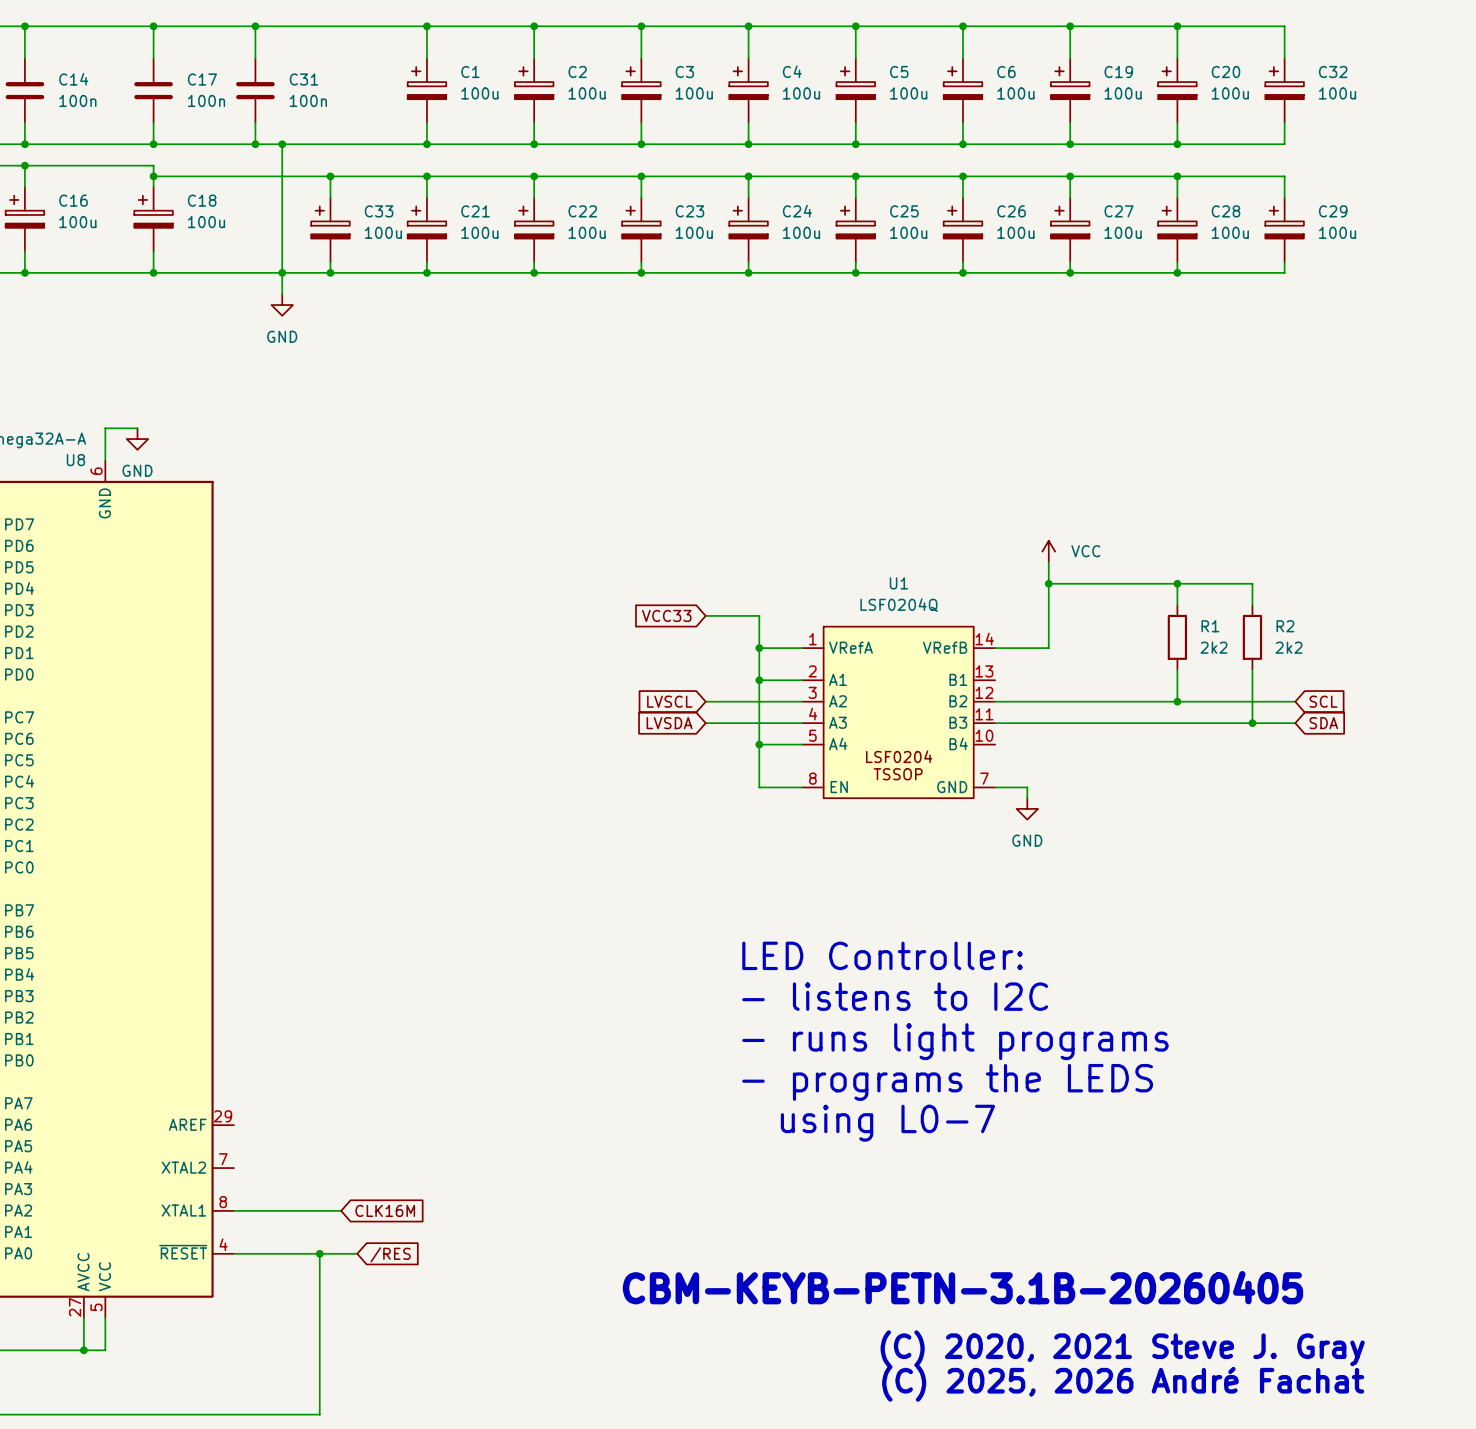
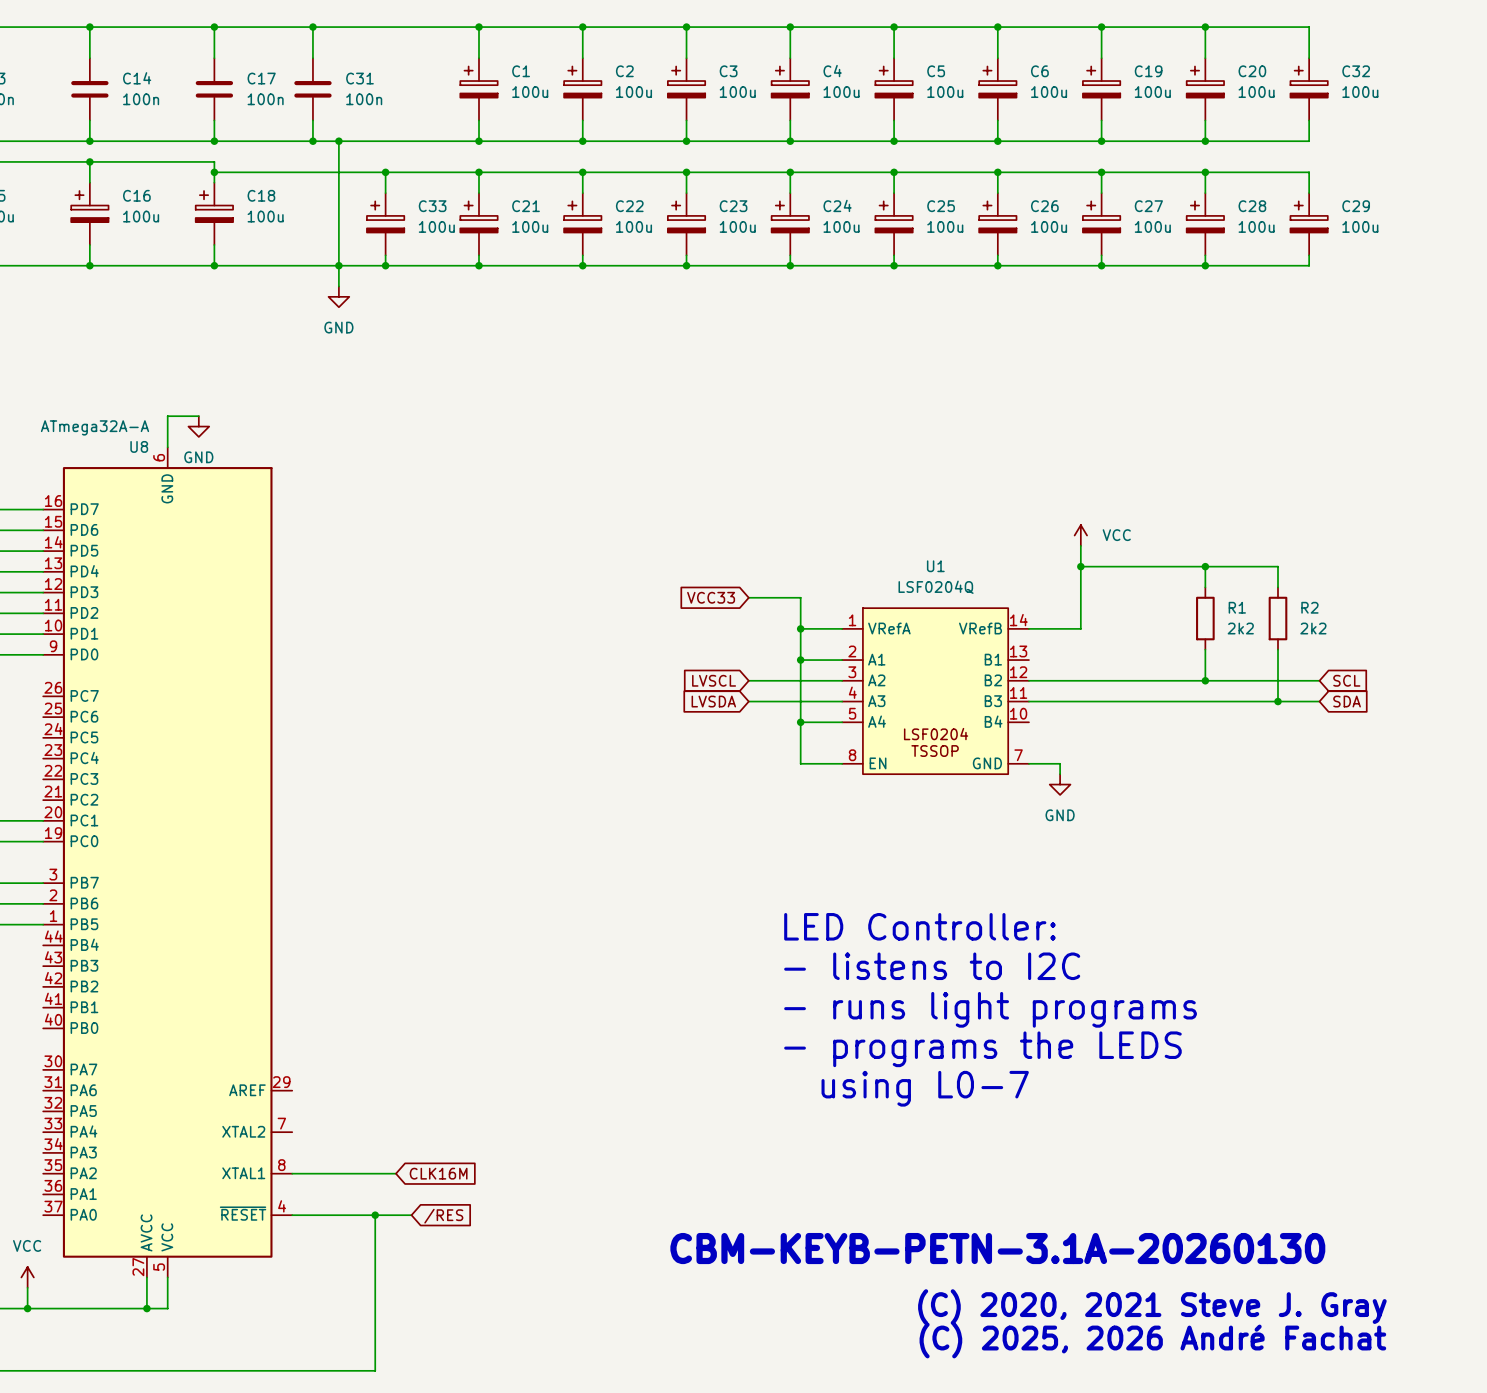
text: CBM-KEYB-PETN-3.1B-20260405 (962, 1287) -> CBM-KEYB-PETN-3.1A-20260130 (997, 1248)

